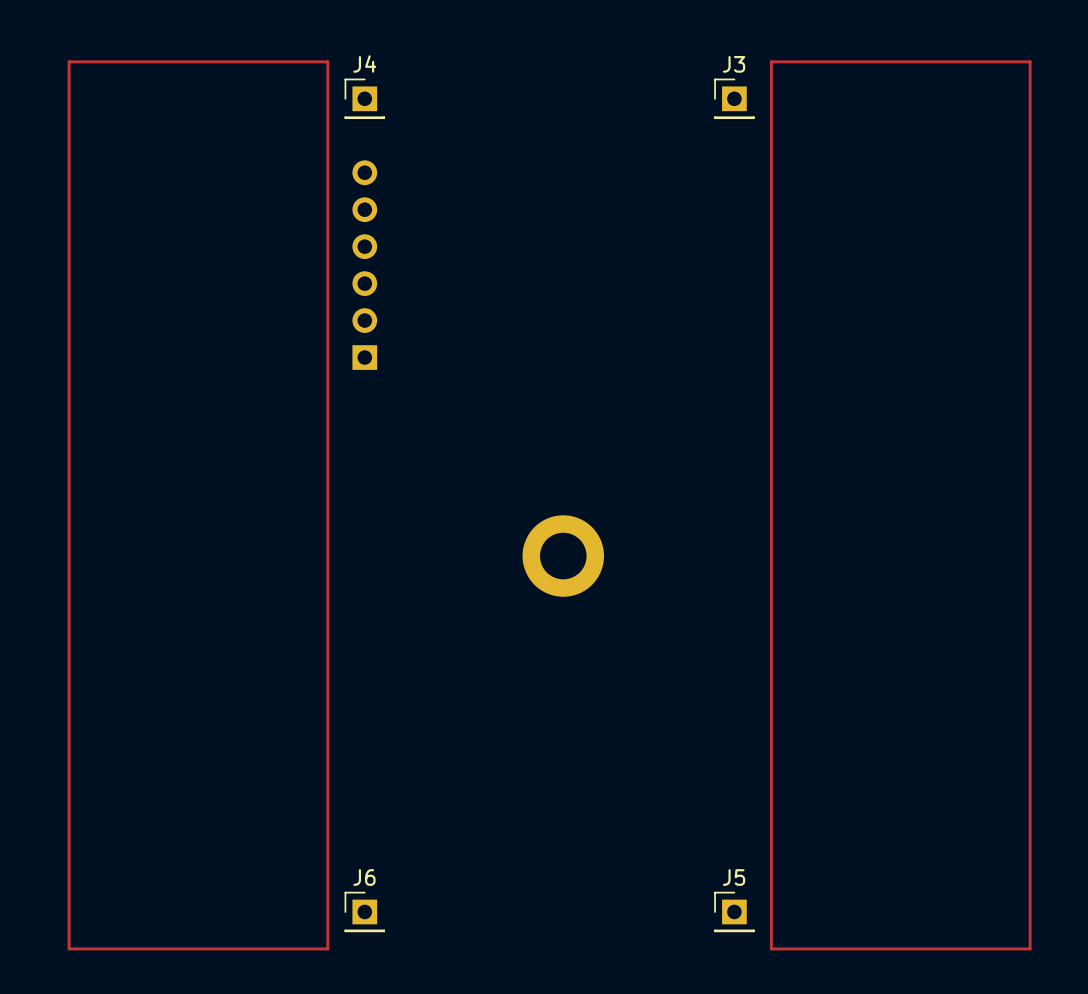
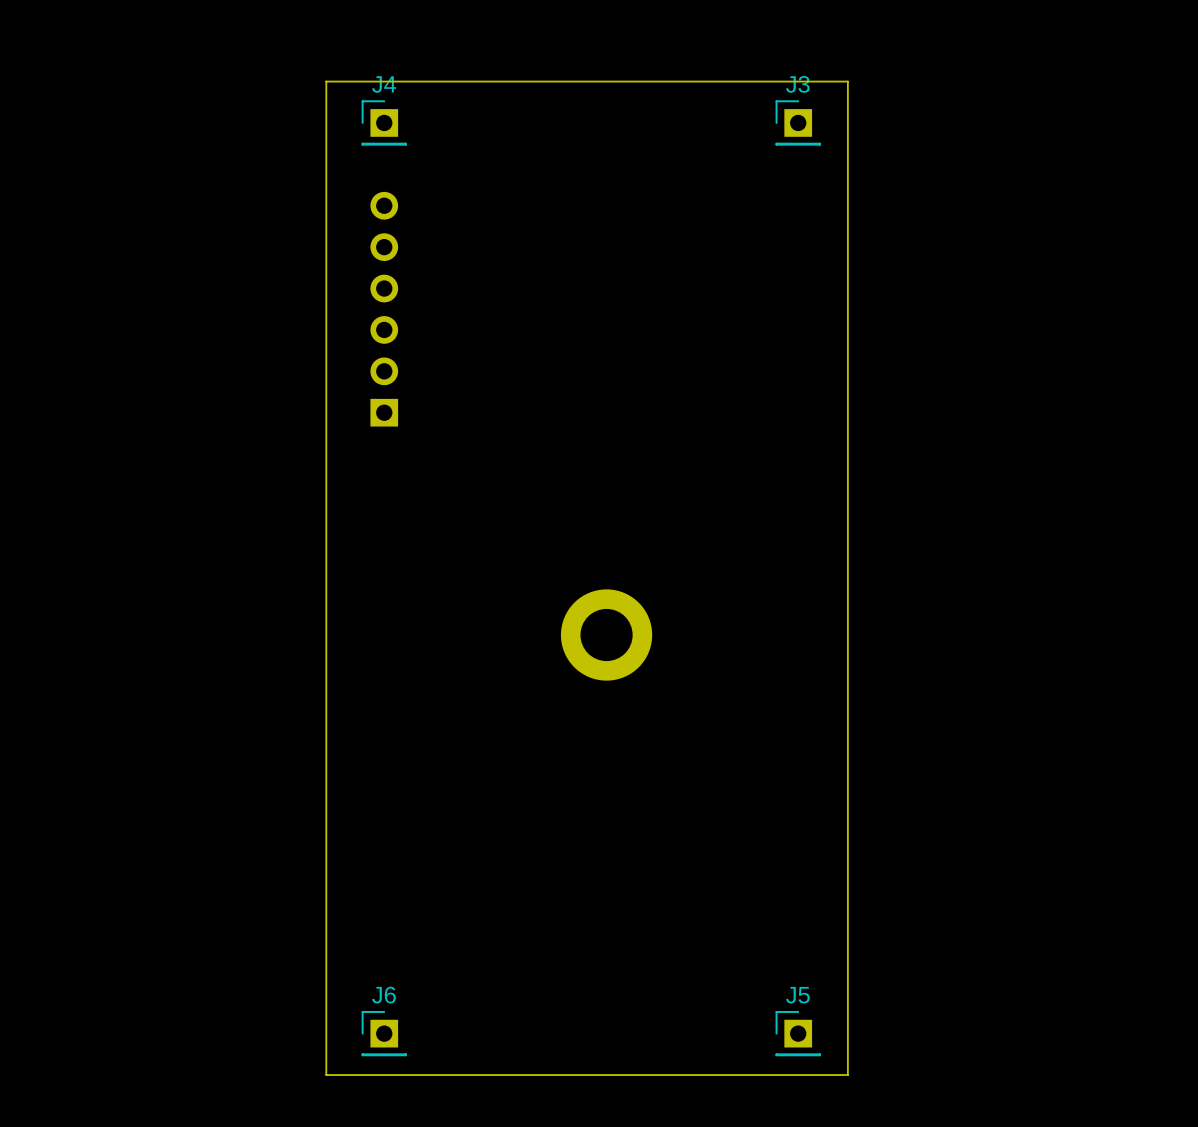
track: (69, 61) (327, 61) (327, 948) (69, 948) (69, 61) -> none
board edge: none -> (326, 81) (326, 1075) (847, 1075) (847, 81) (326, 81)
track: (771, 61) (1030, 61) (1030, 948) (771, 948) (771, 61) -> none

